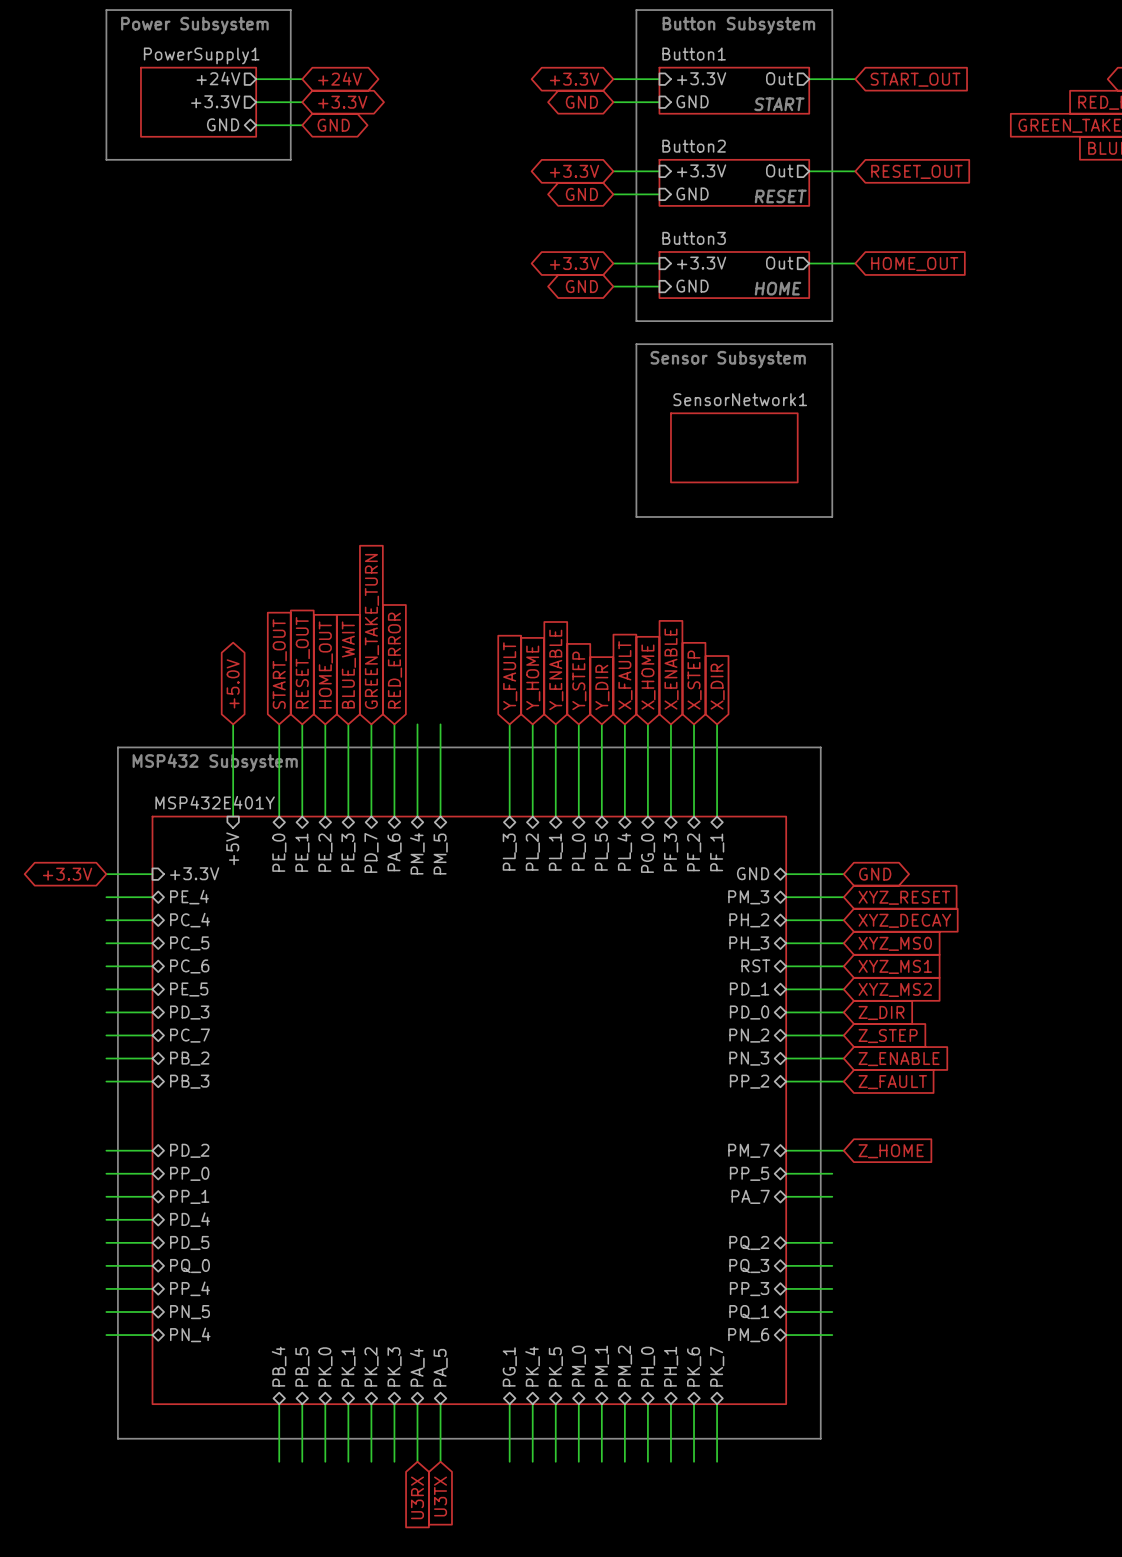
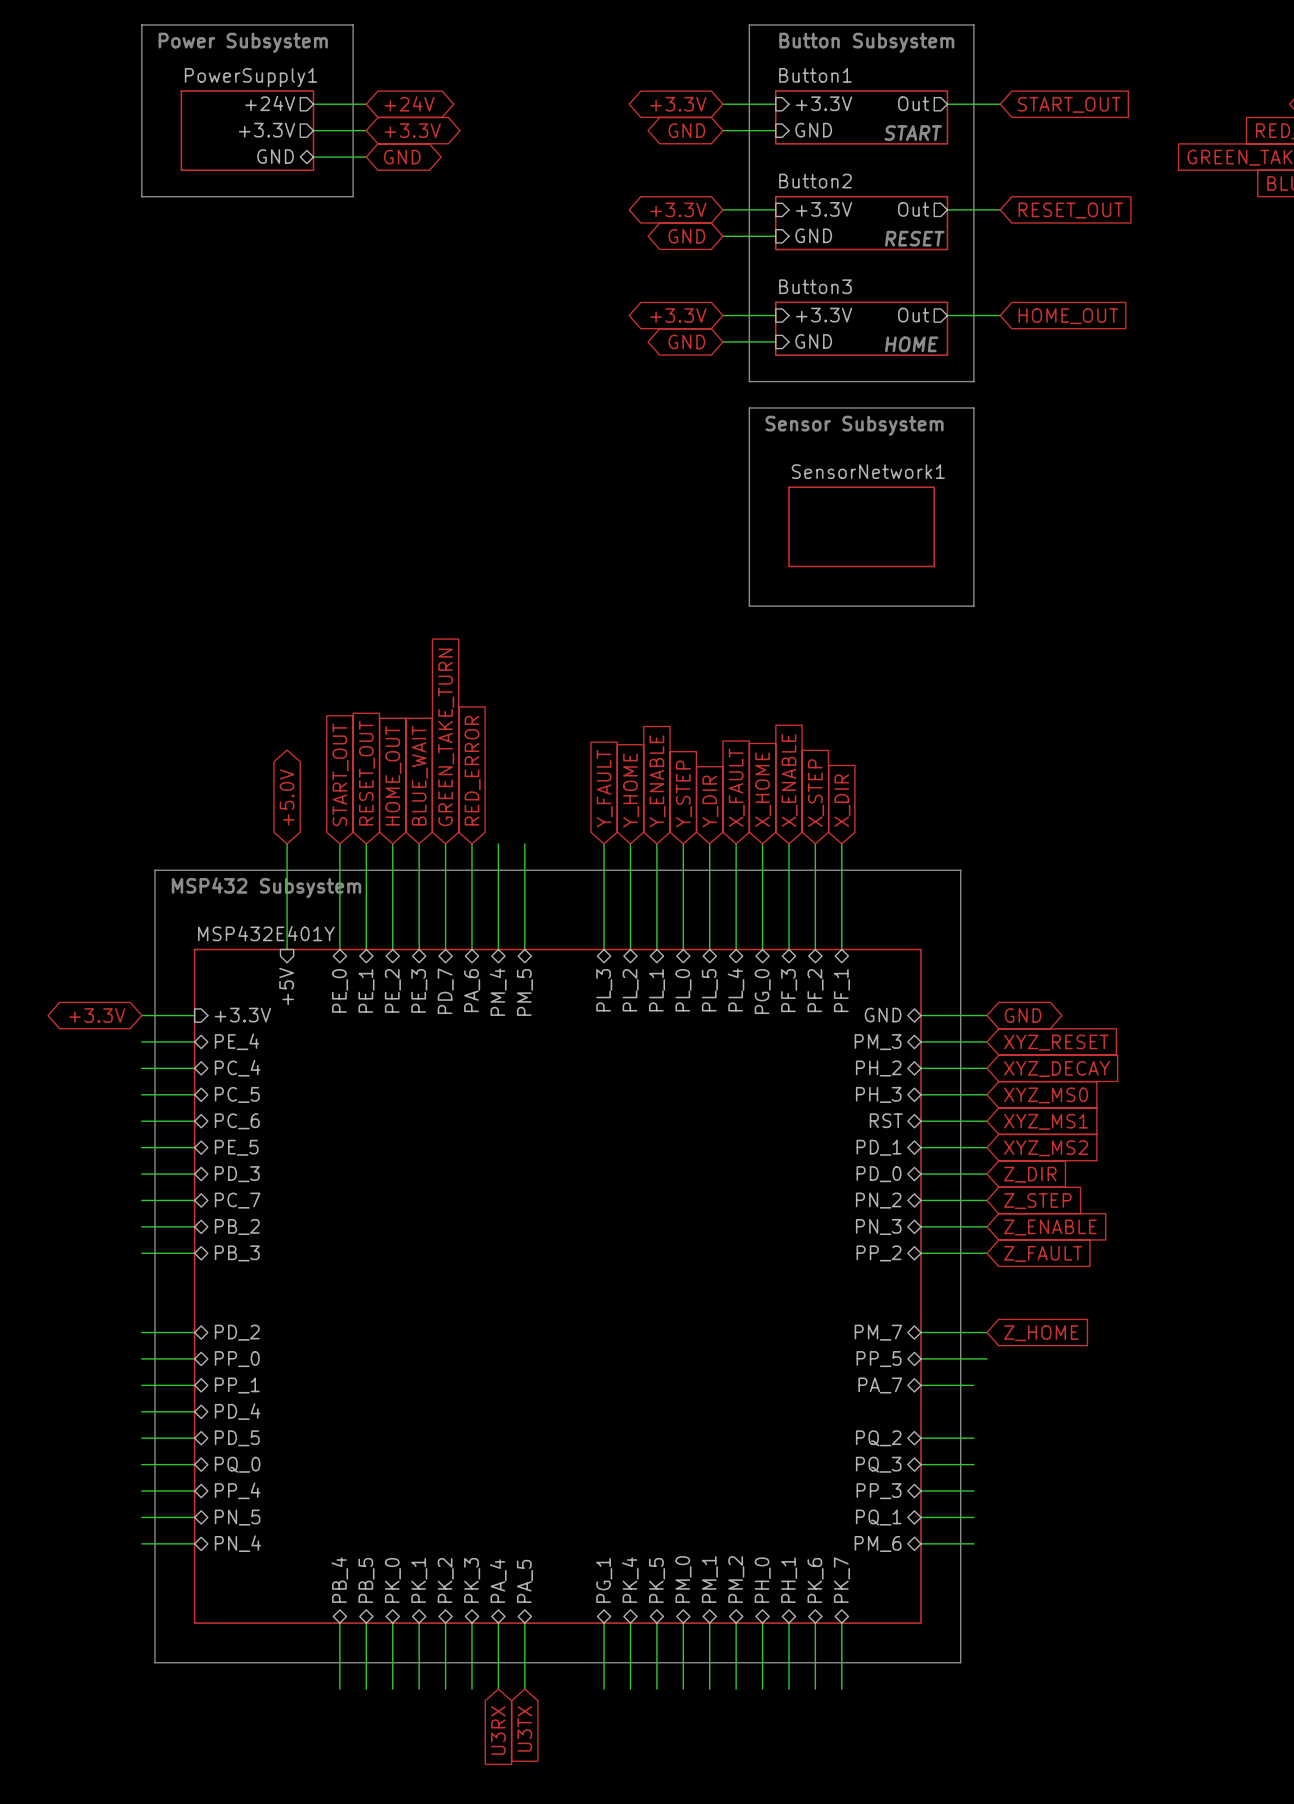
wire: none -> (973, 1358) (987, 1358)

